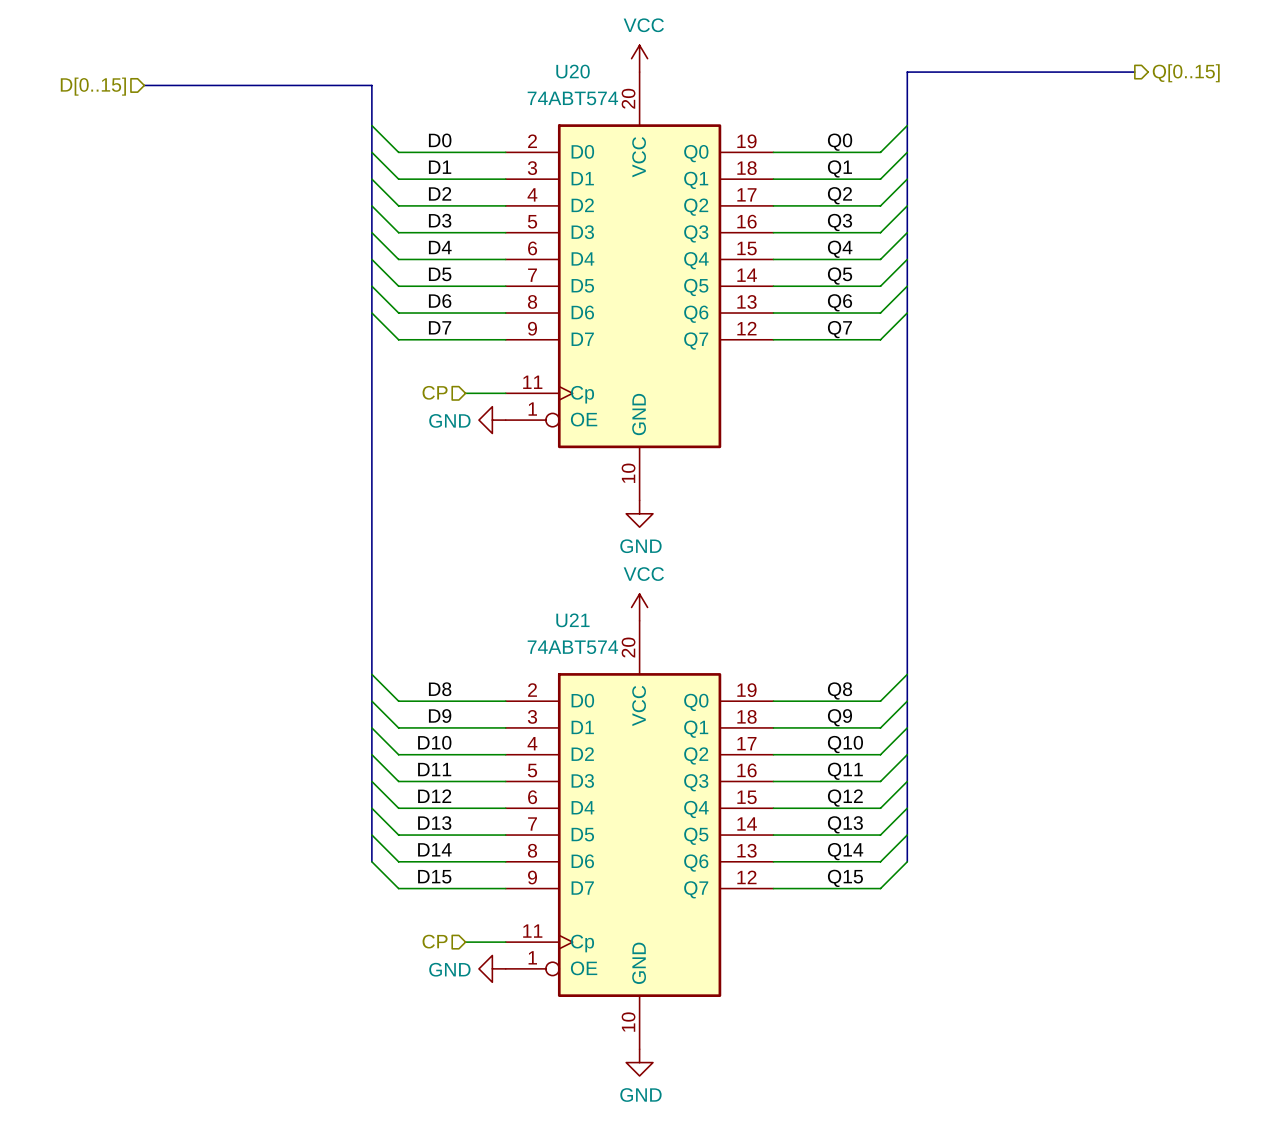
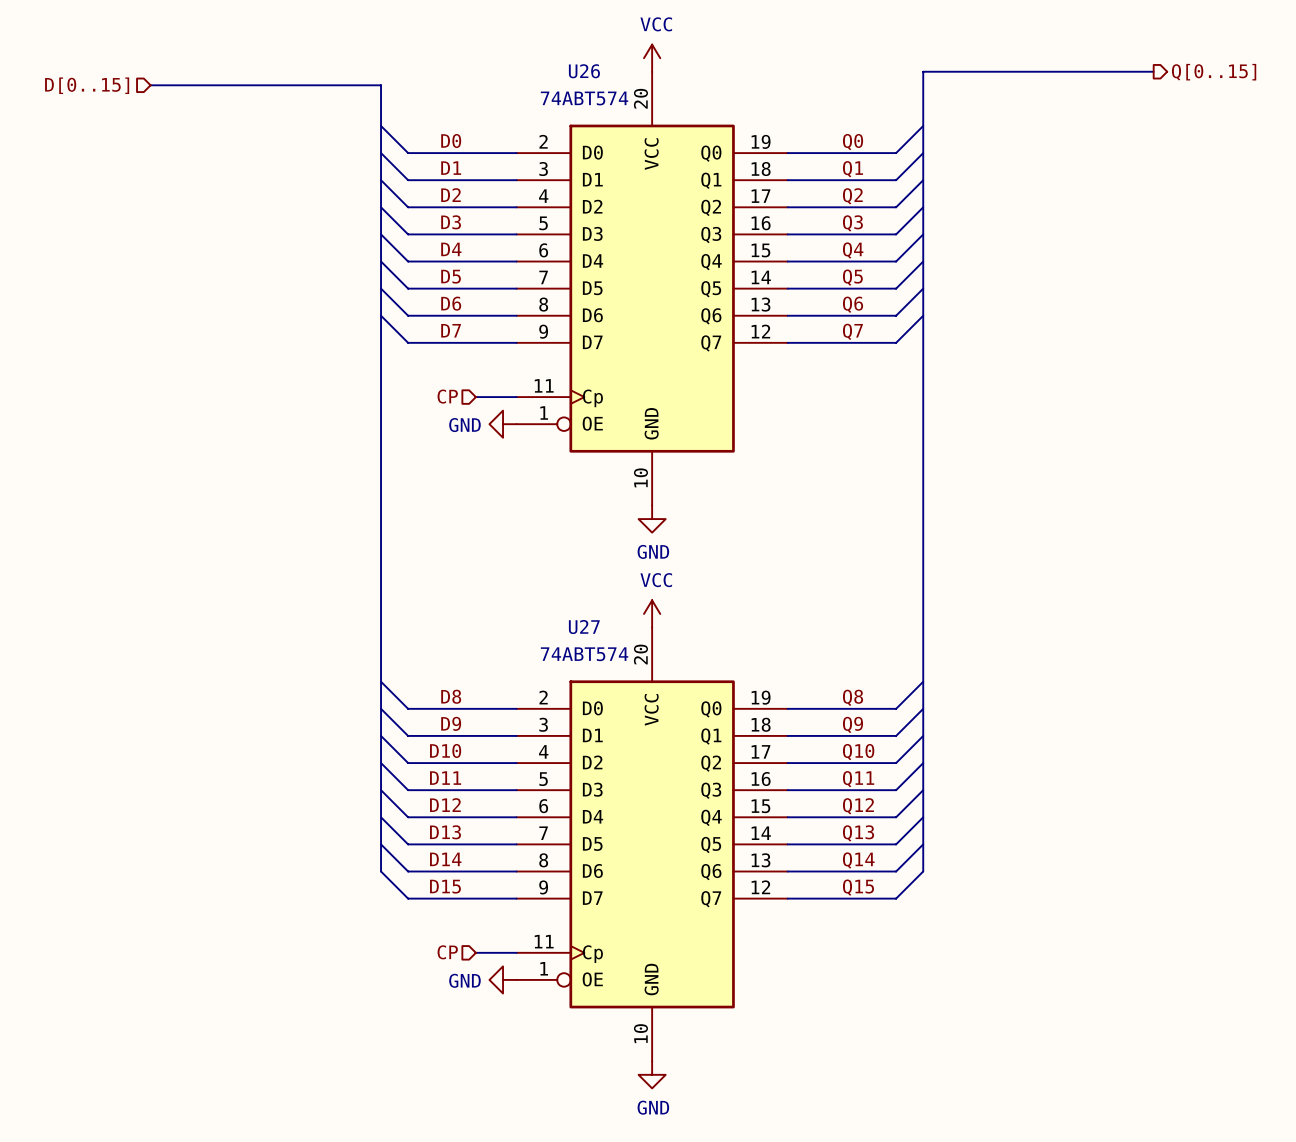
U20 name: U20 (573, 71) -> U26 (584, 71)
U21 name: U21 (572, 620) -> U27 (584, 627)

